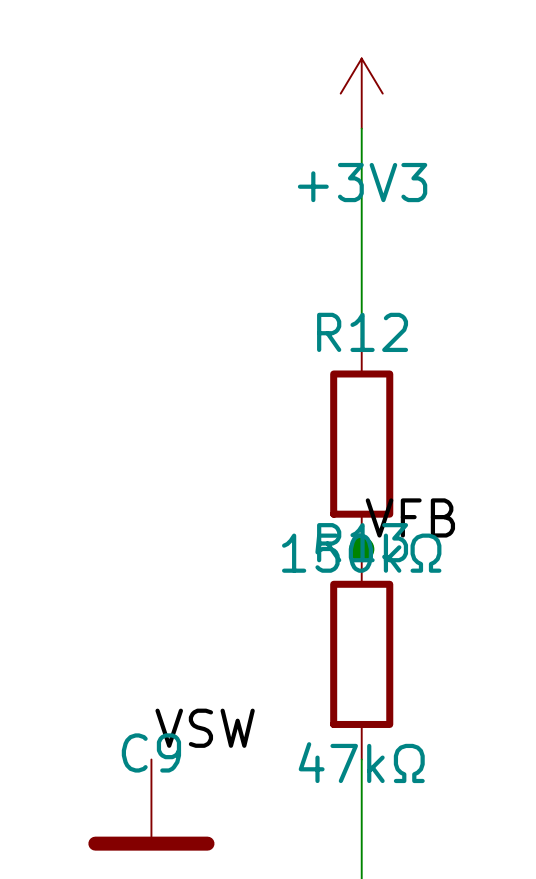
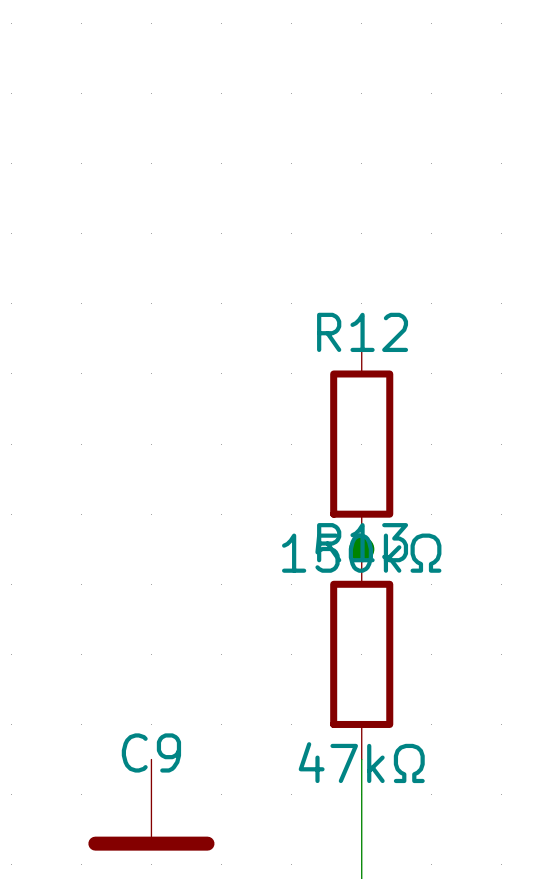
power symbol: +3V3 (361, 93) -> none
wire: (361, 128) (361, 338) -> none
label: VFB (410, 517) -> none
label: VSW (205, 728) -> none

